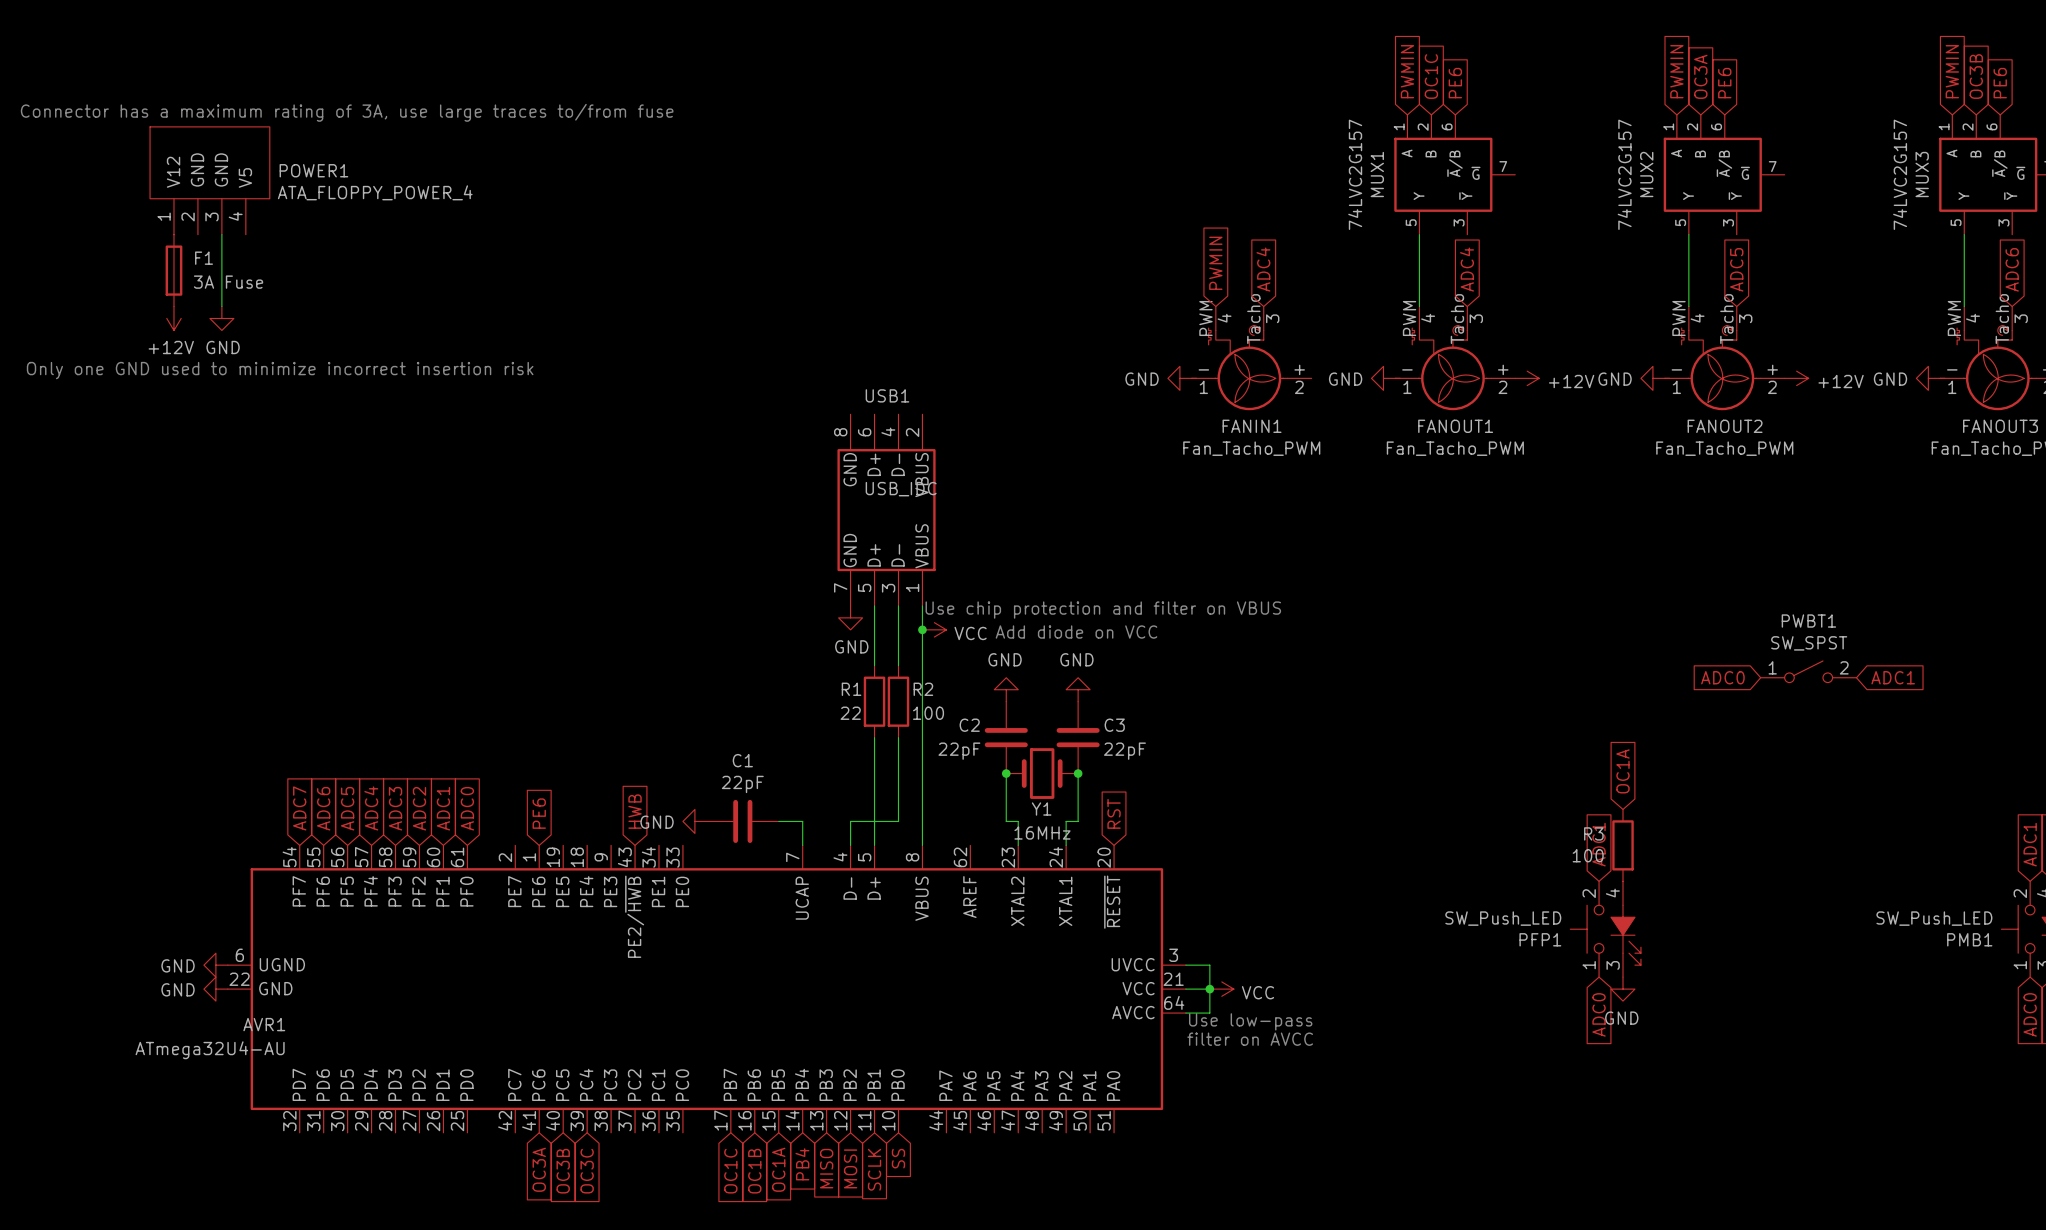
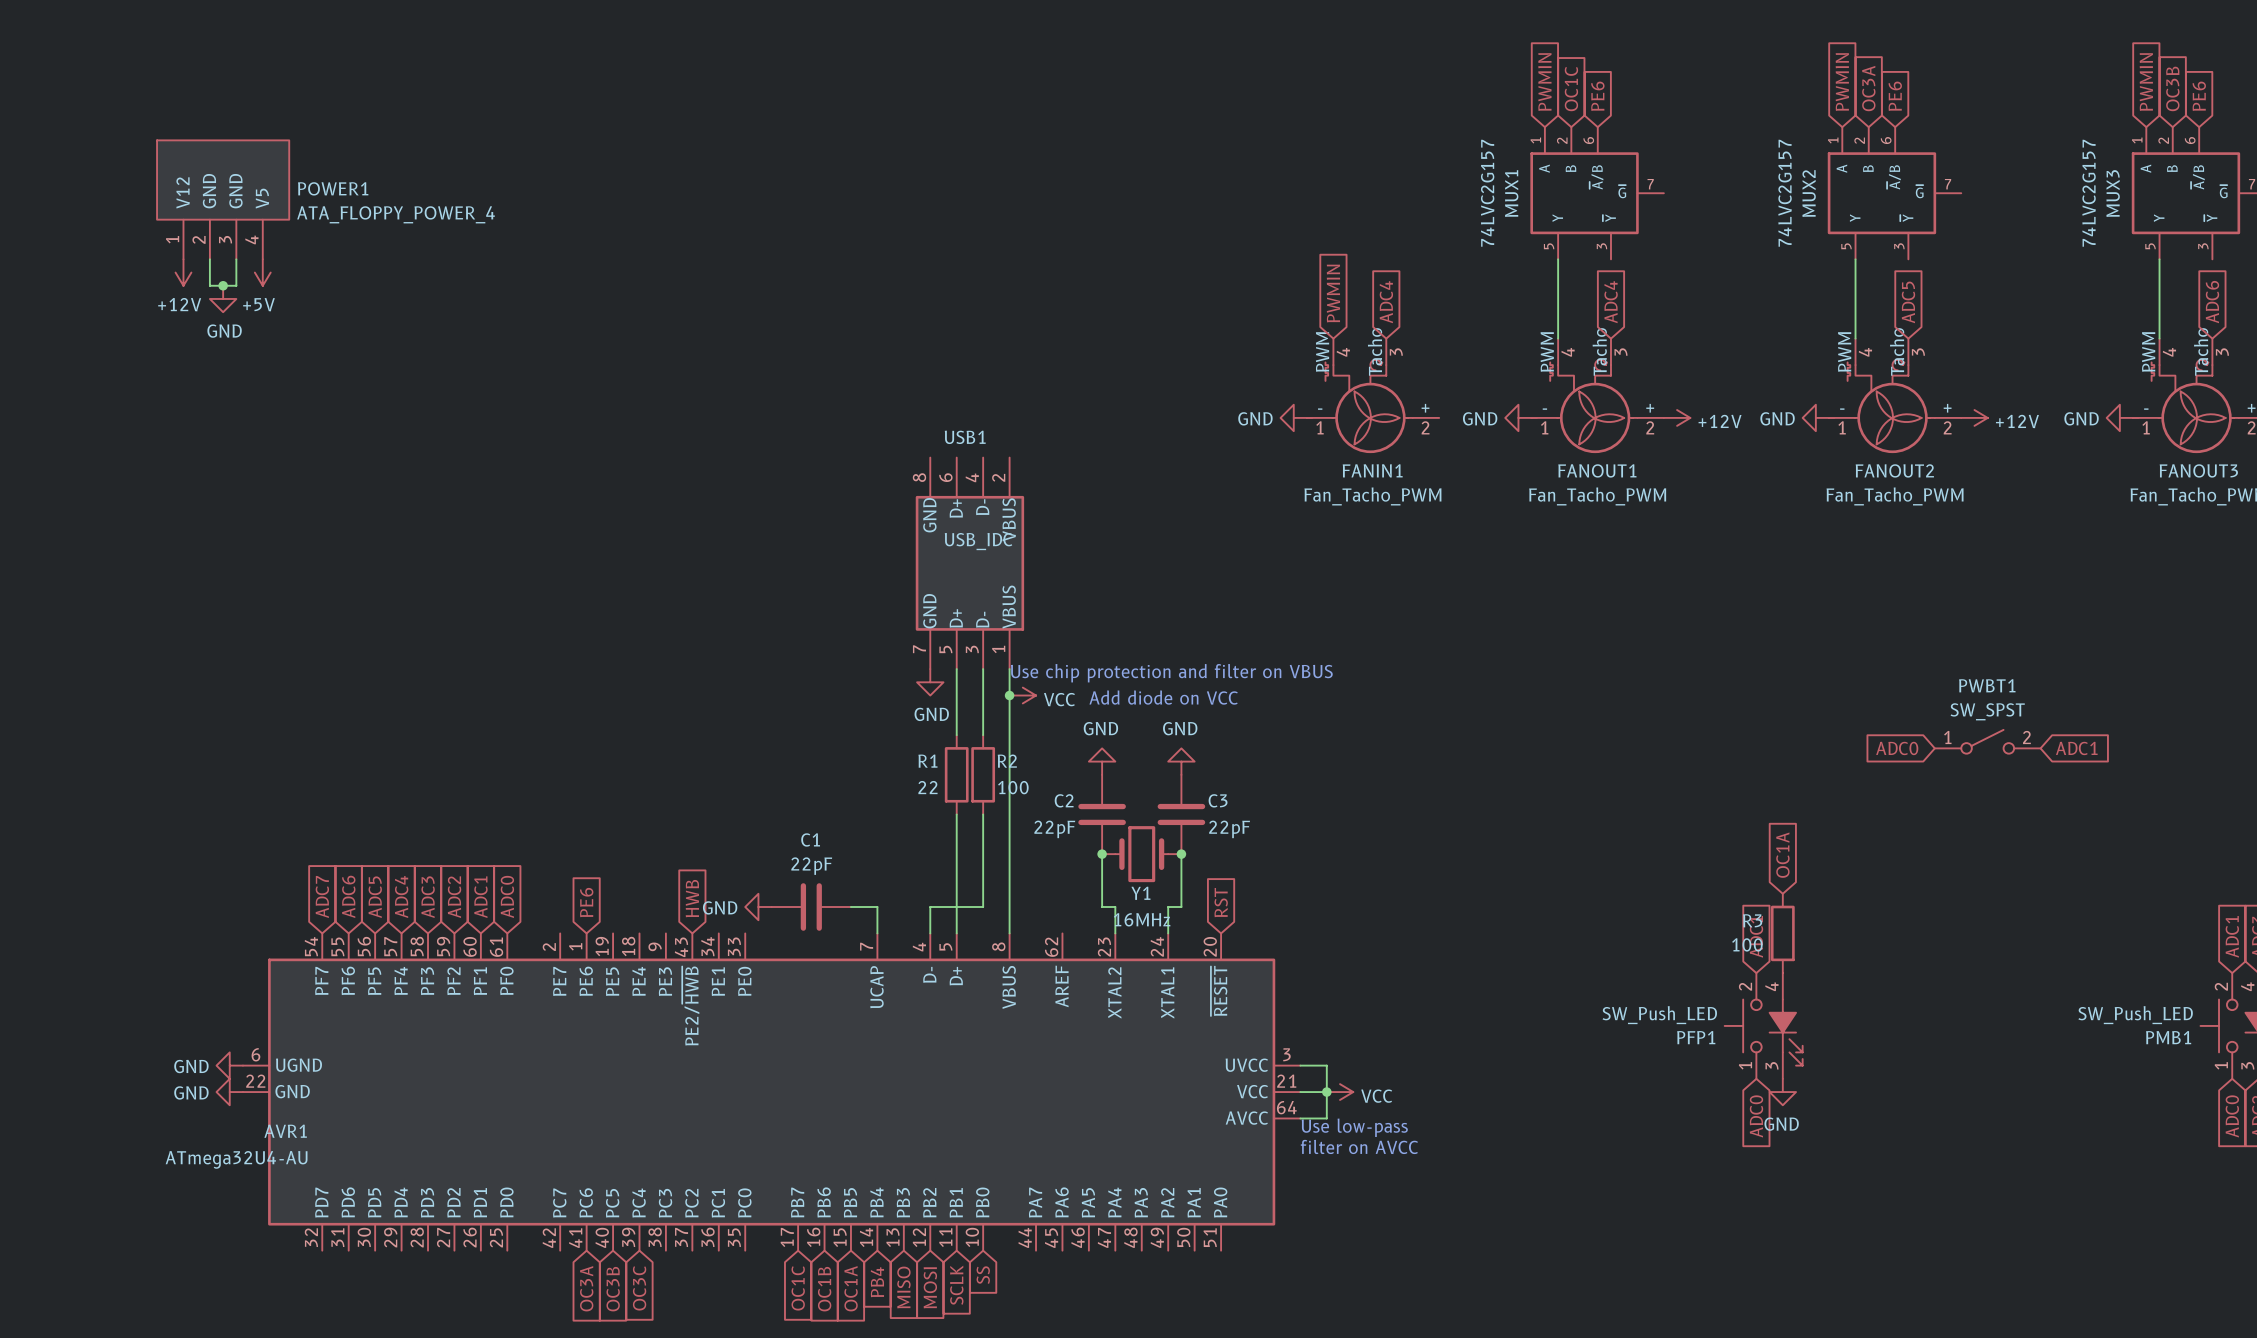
text: Connector has a maximum rating of 3A, use large traces to/from fuse (347, 112) -> none
power symbol: none -> +5V (262, 272)
junction: none -> (223, 285)
wire: (221, 258) (221, 306) -> (236, 285) (209, 285) (209, 259)
F1: 3A Fuse (173, 270) -> none
power symbol position: +12V (173, 318) -> +12V (183, 272)
power symbol position: GND (221, 318) -> GND (223, 298)
text: Only one GND used to minimize incorrect insertion risk (280, 370) -> none

